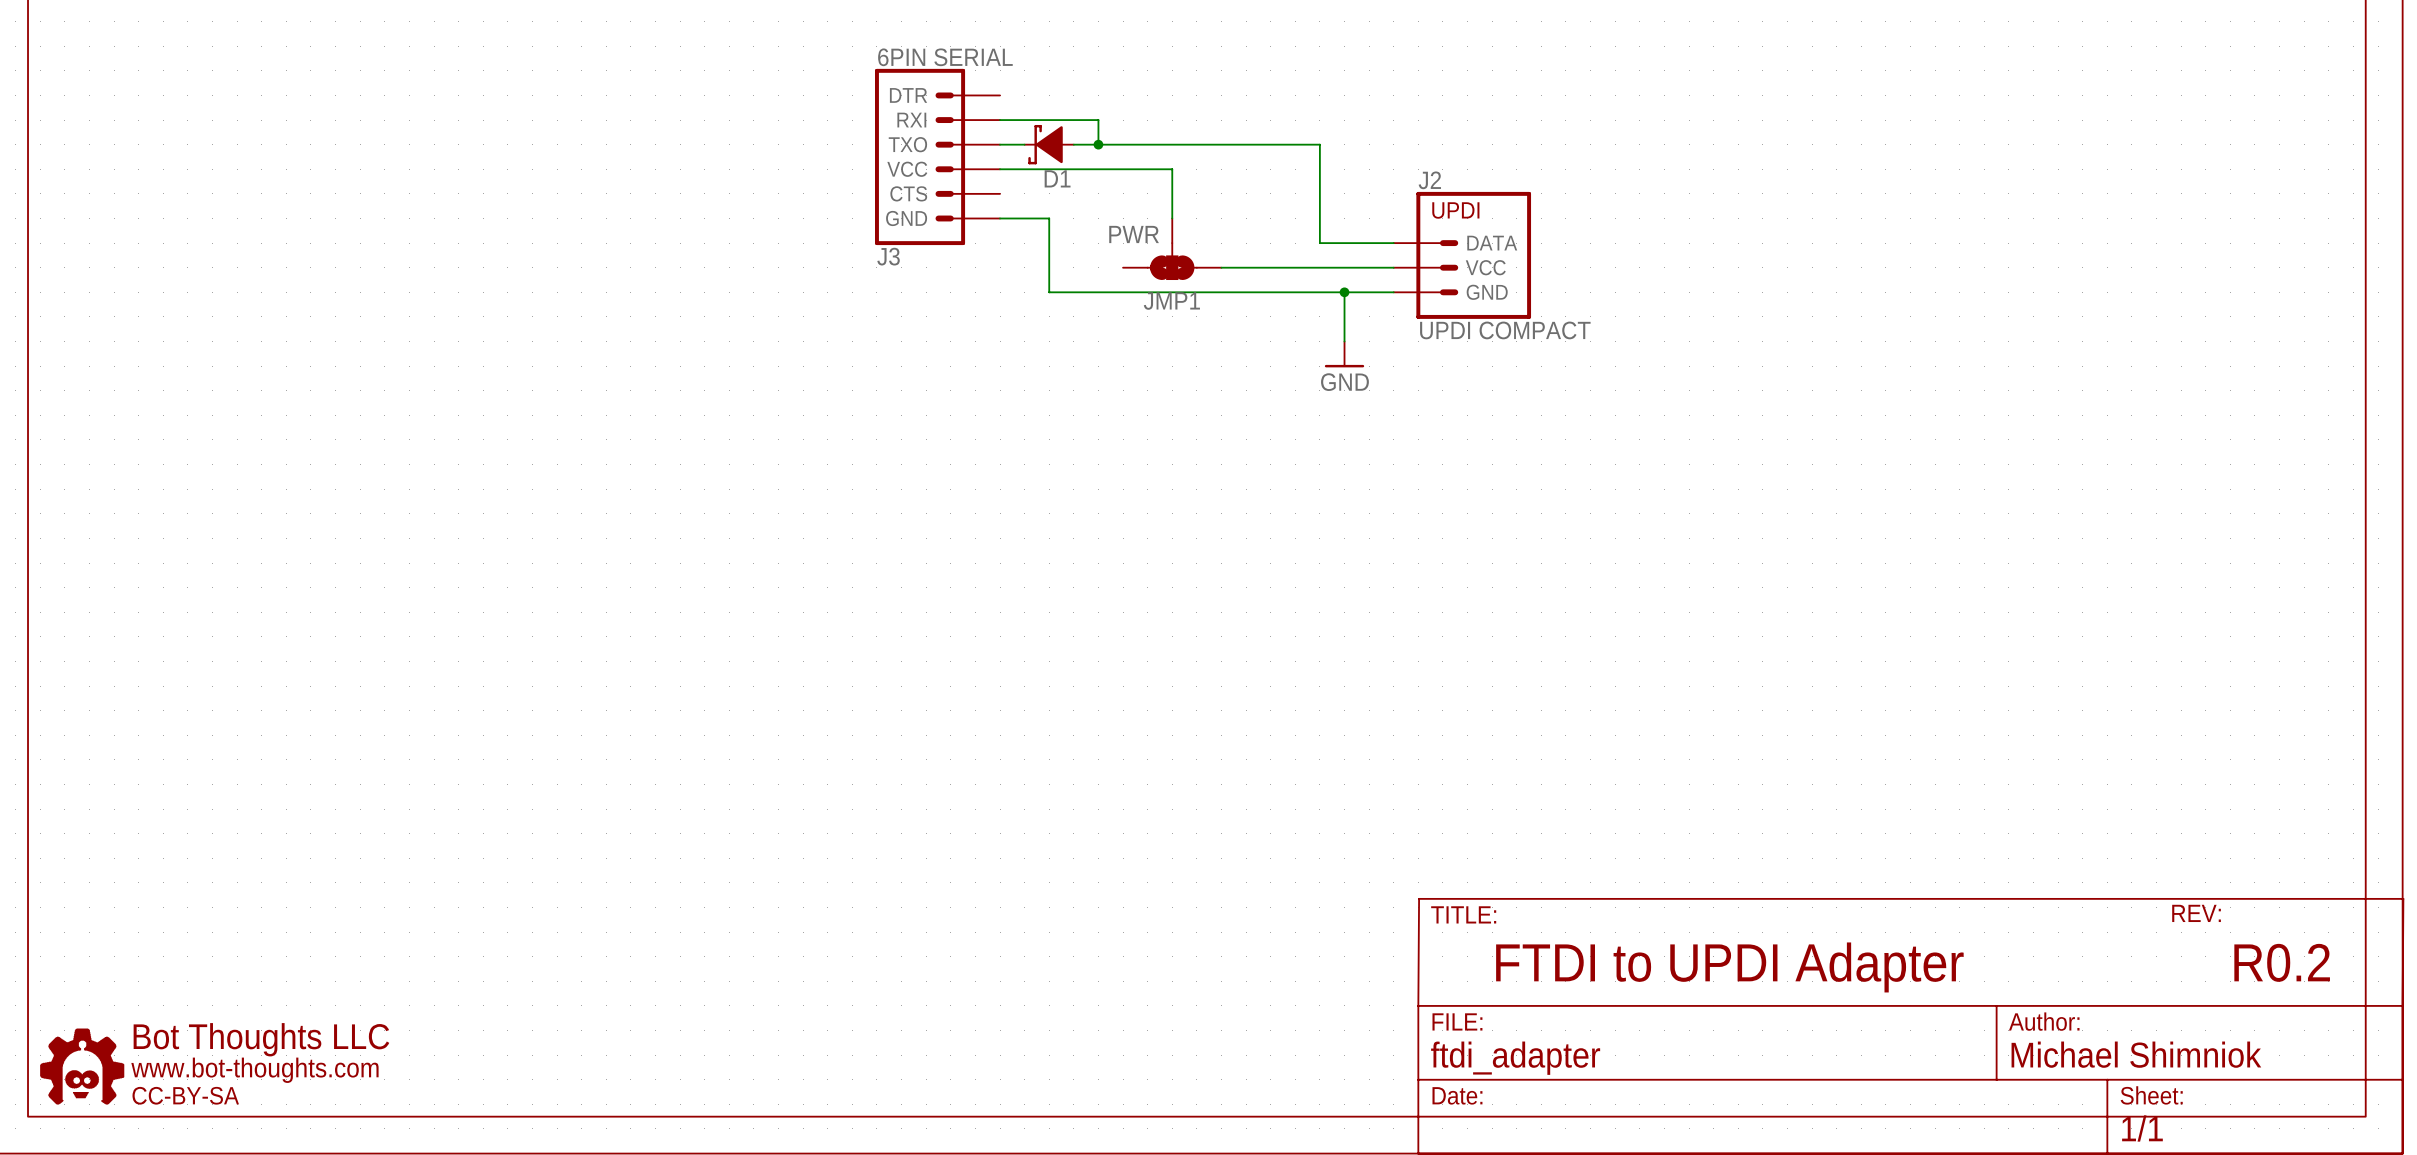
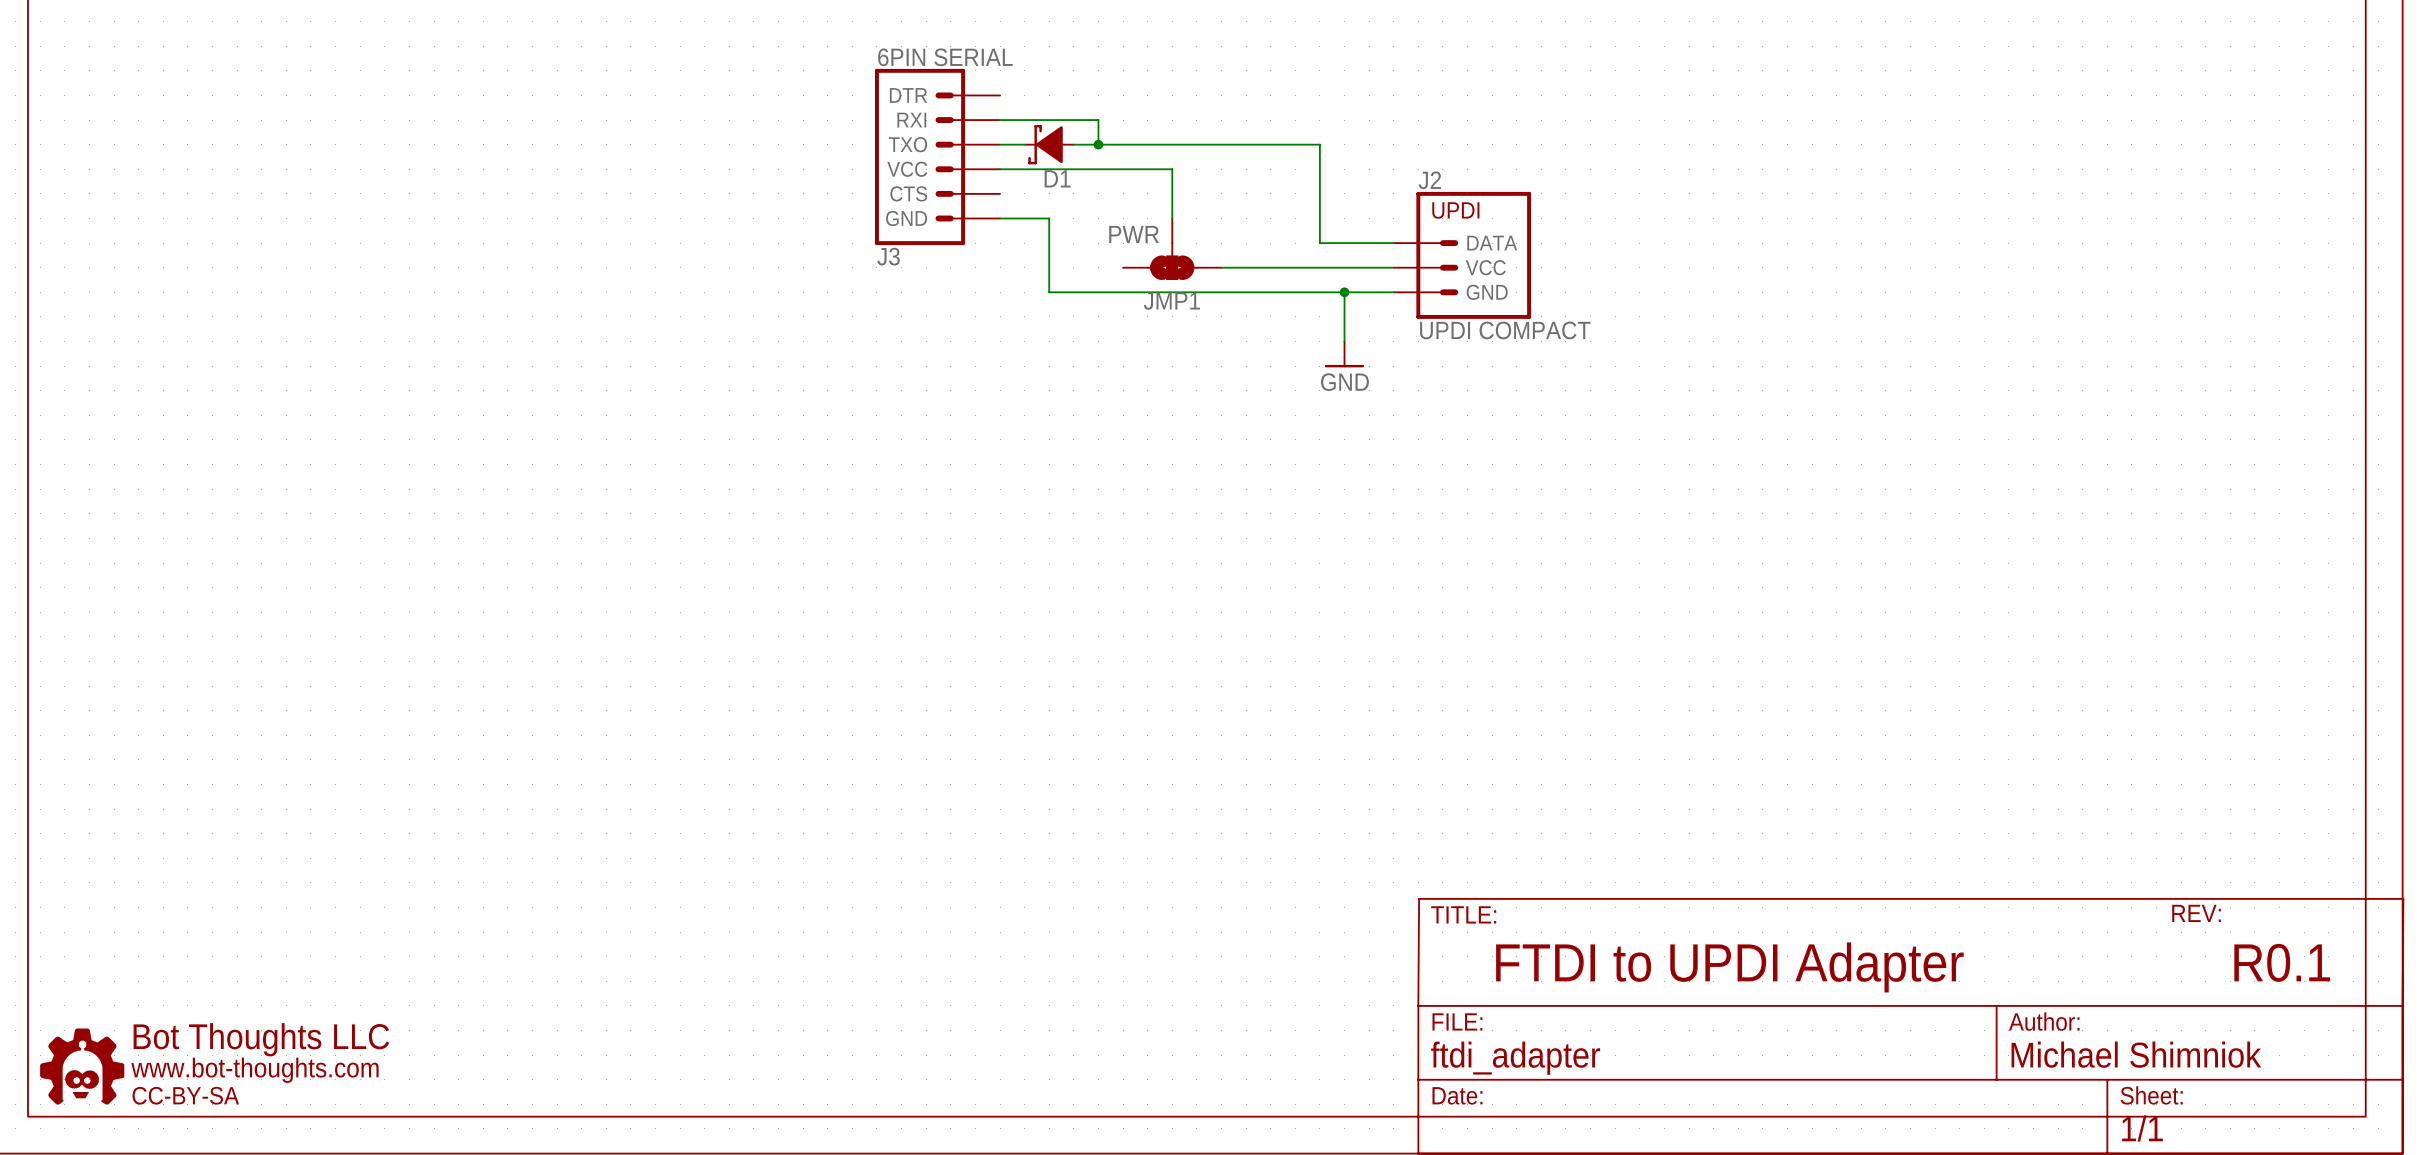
text: R0.2 (2282, 962) -> R0.1 (2282, 962)

